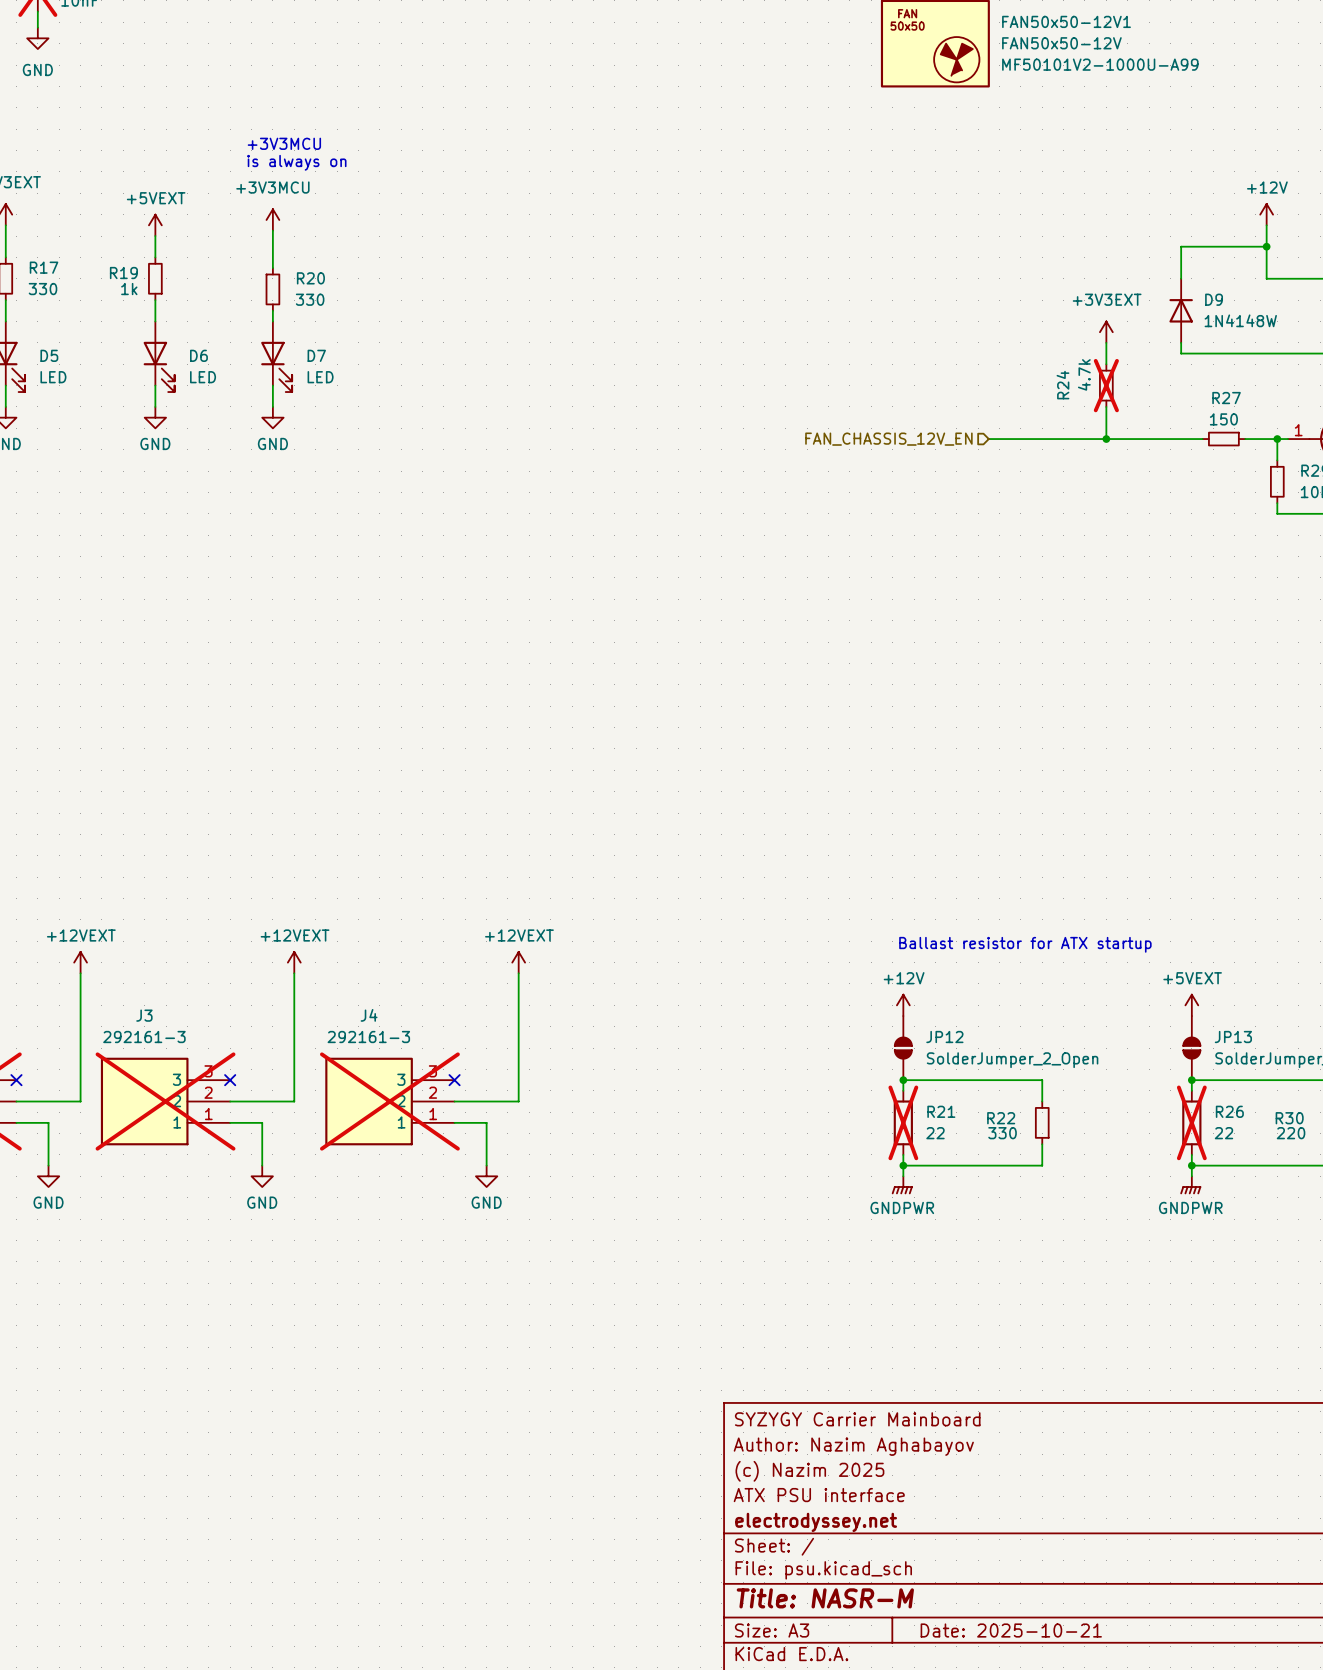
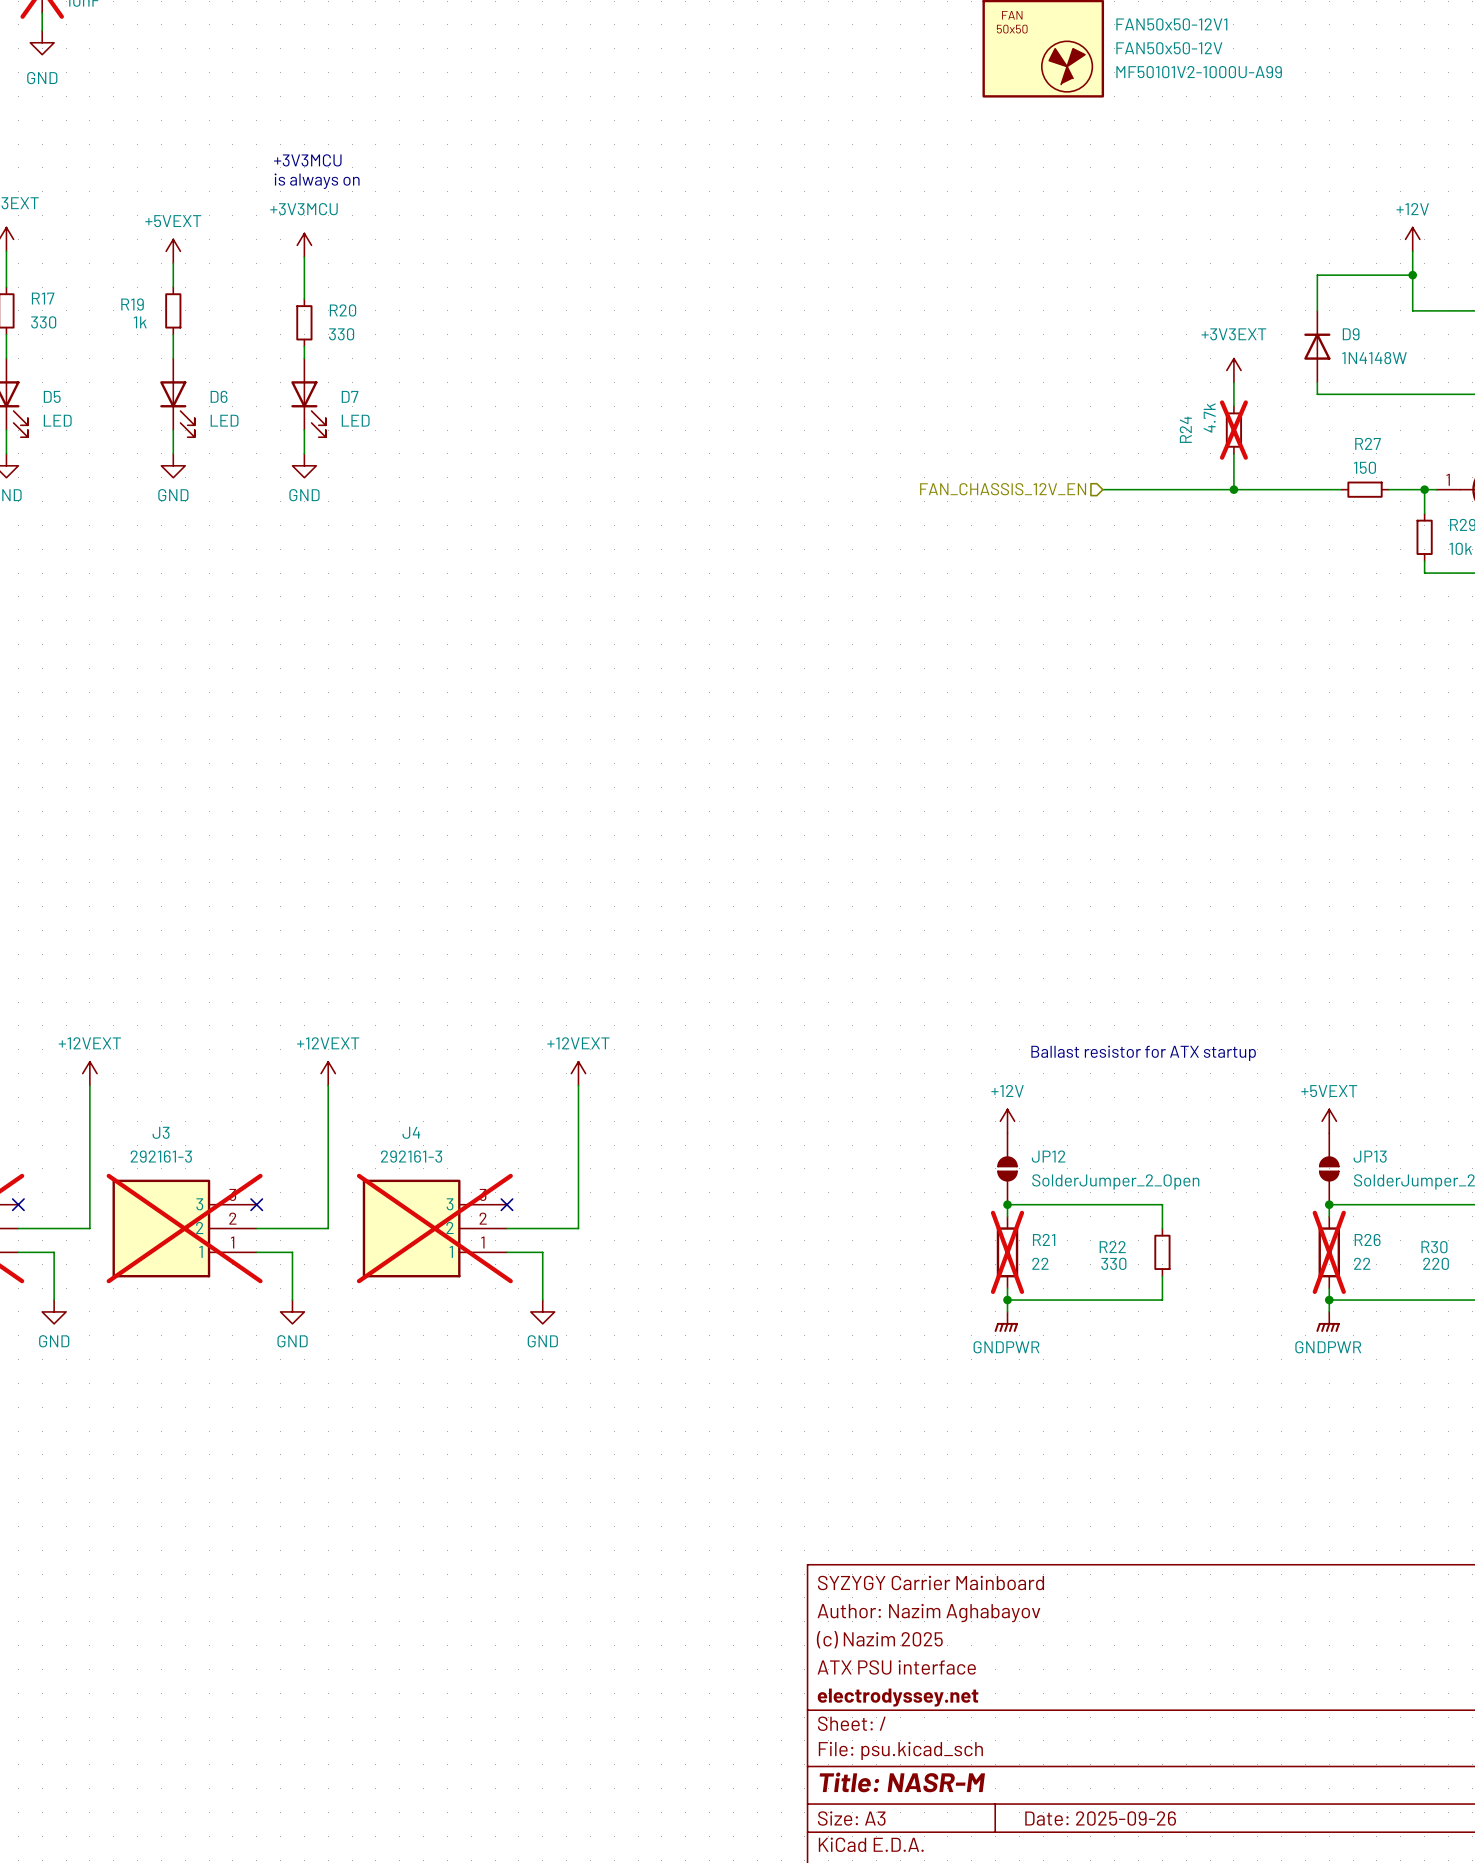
title block: Date: 2025-10-21 (1011, 1630) -> Date: 2025-09-26 (1100, 1818)

